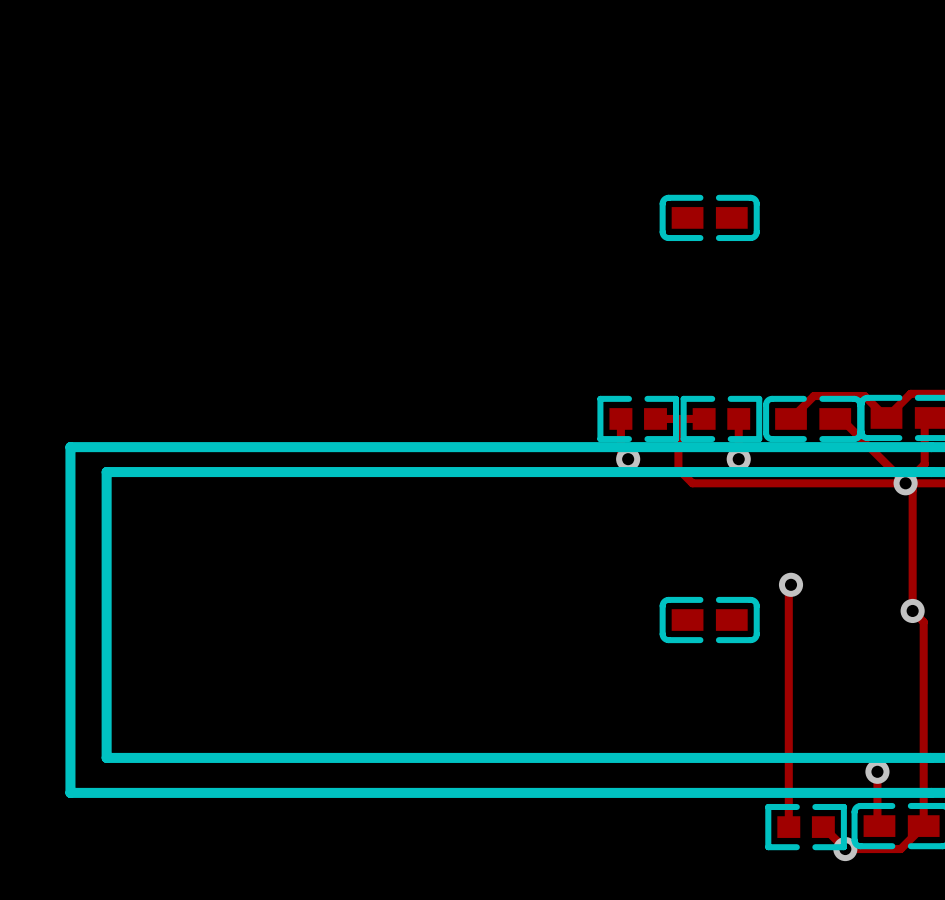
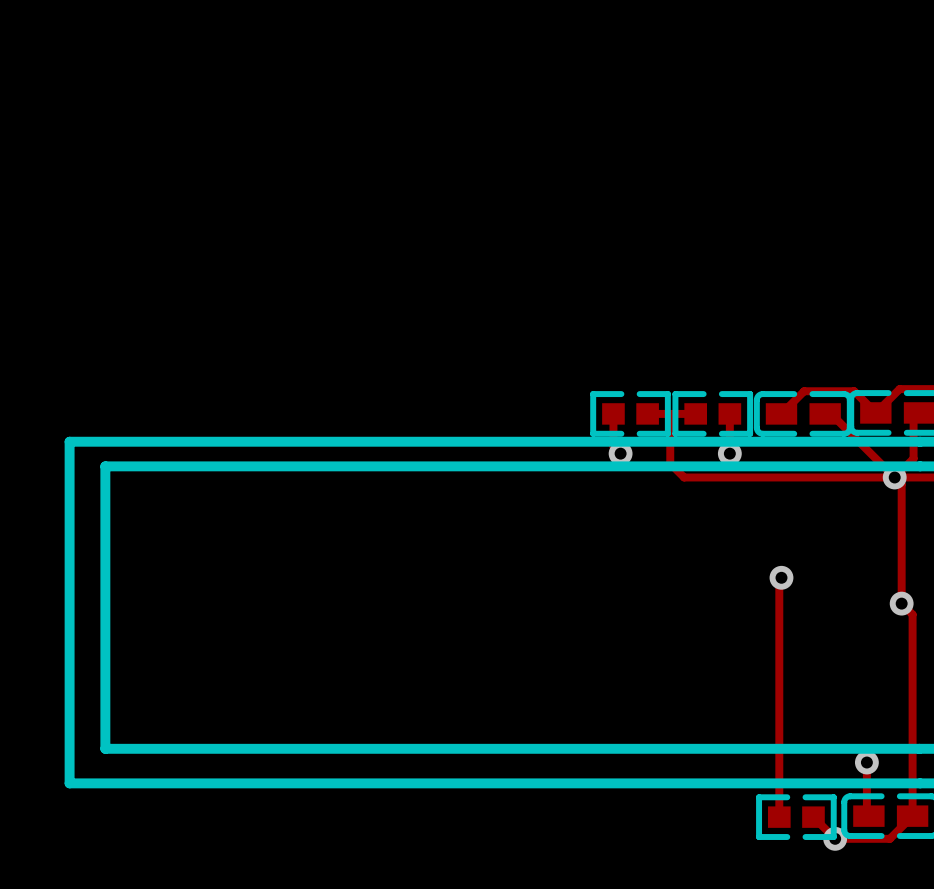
part: (709, 217) -> none
part: (709, 620) -> none

